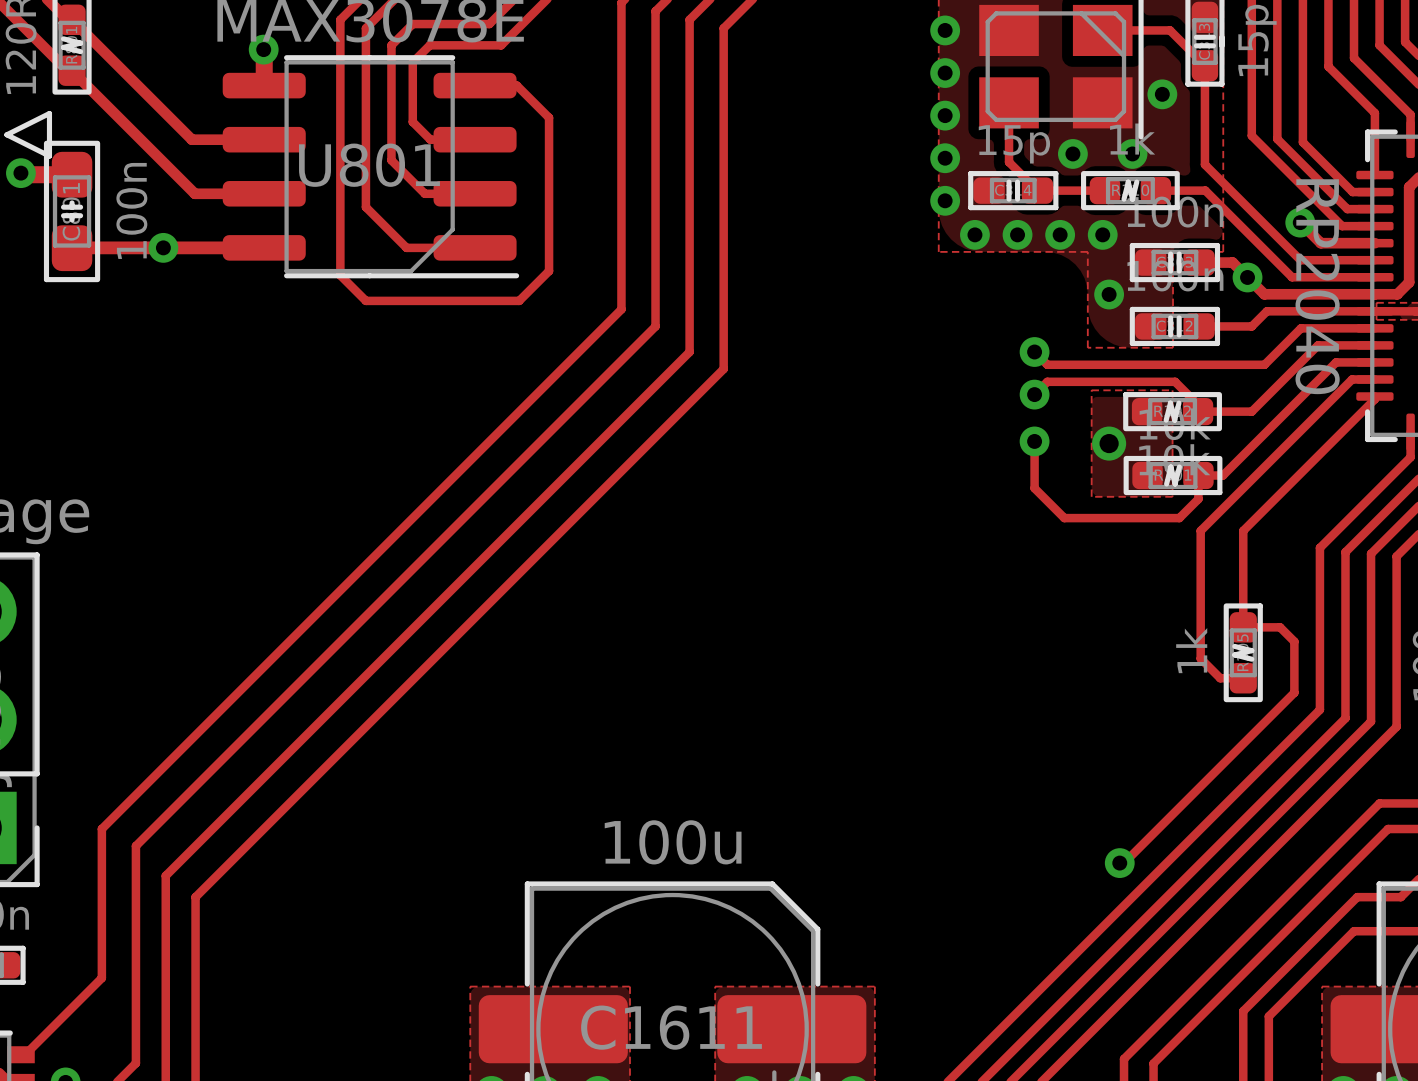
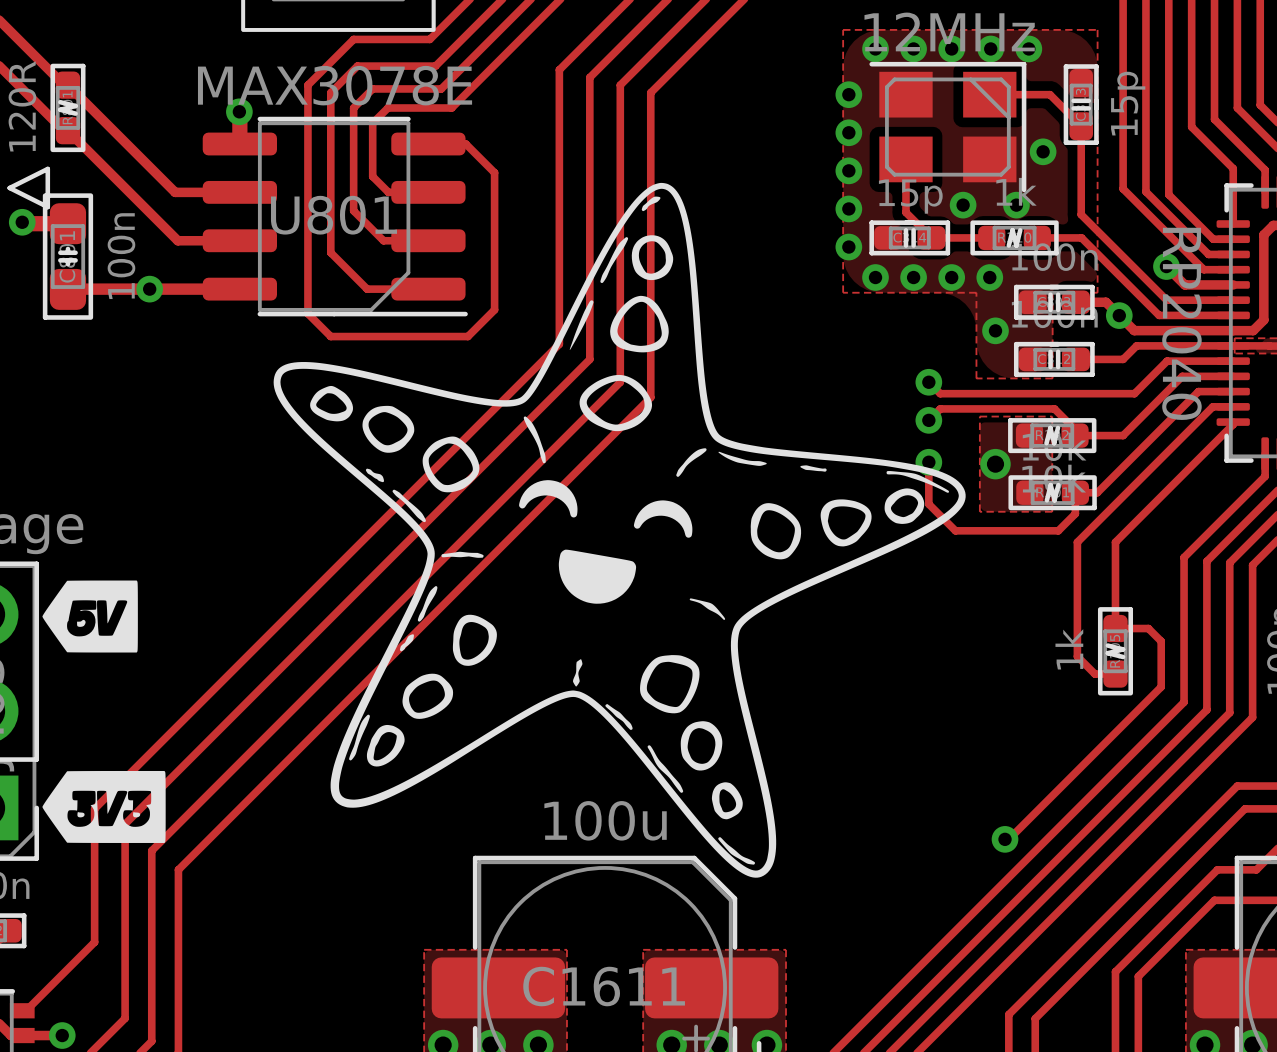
drawing: none -> [273, 182, 966, 878]
drawing: none -> [42, 580, 138, 653]
drawing: none -> [42, 770, 166, 843]

